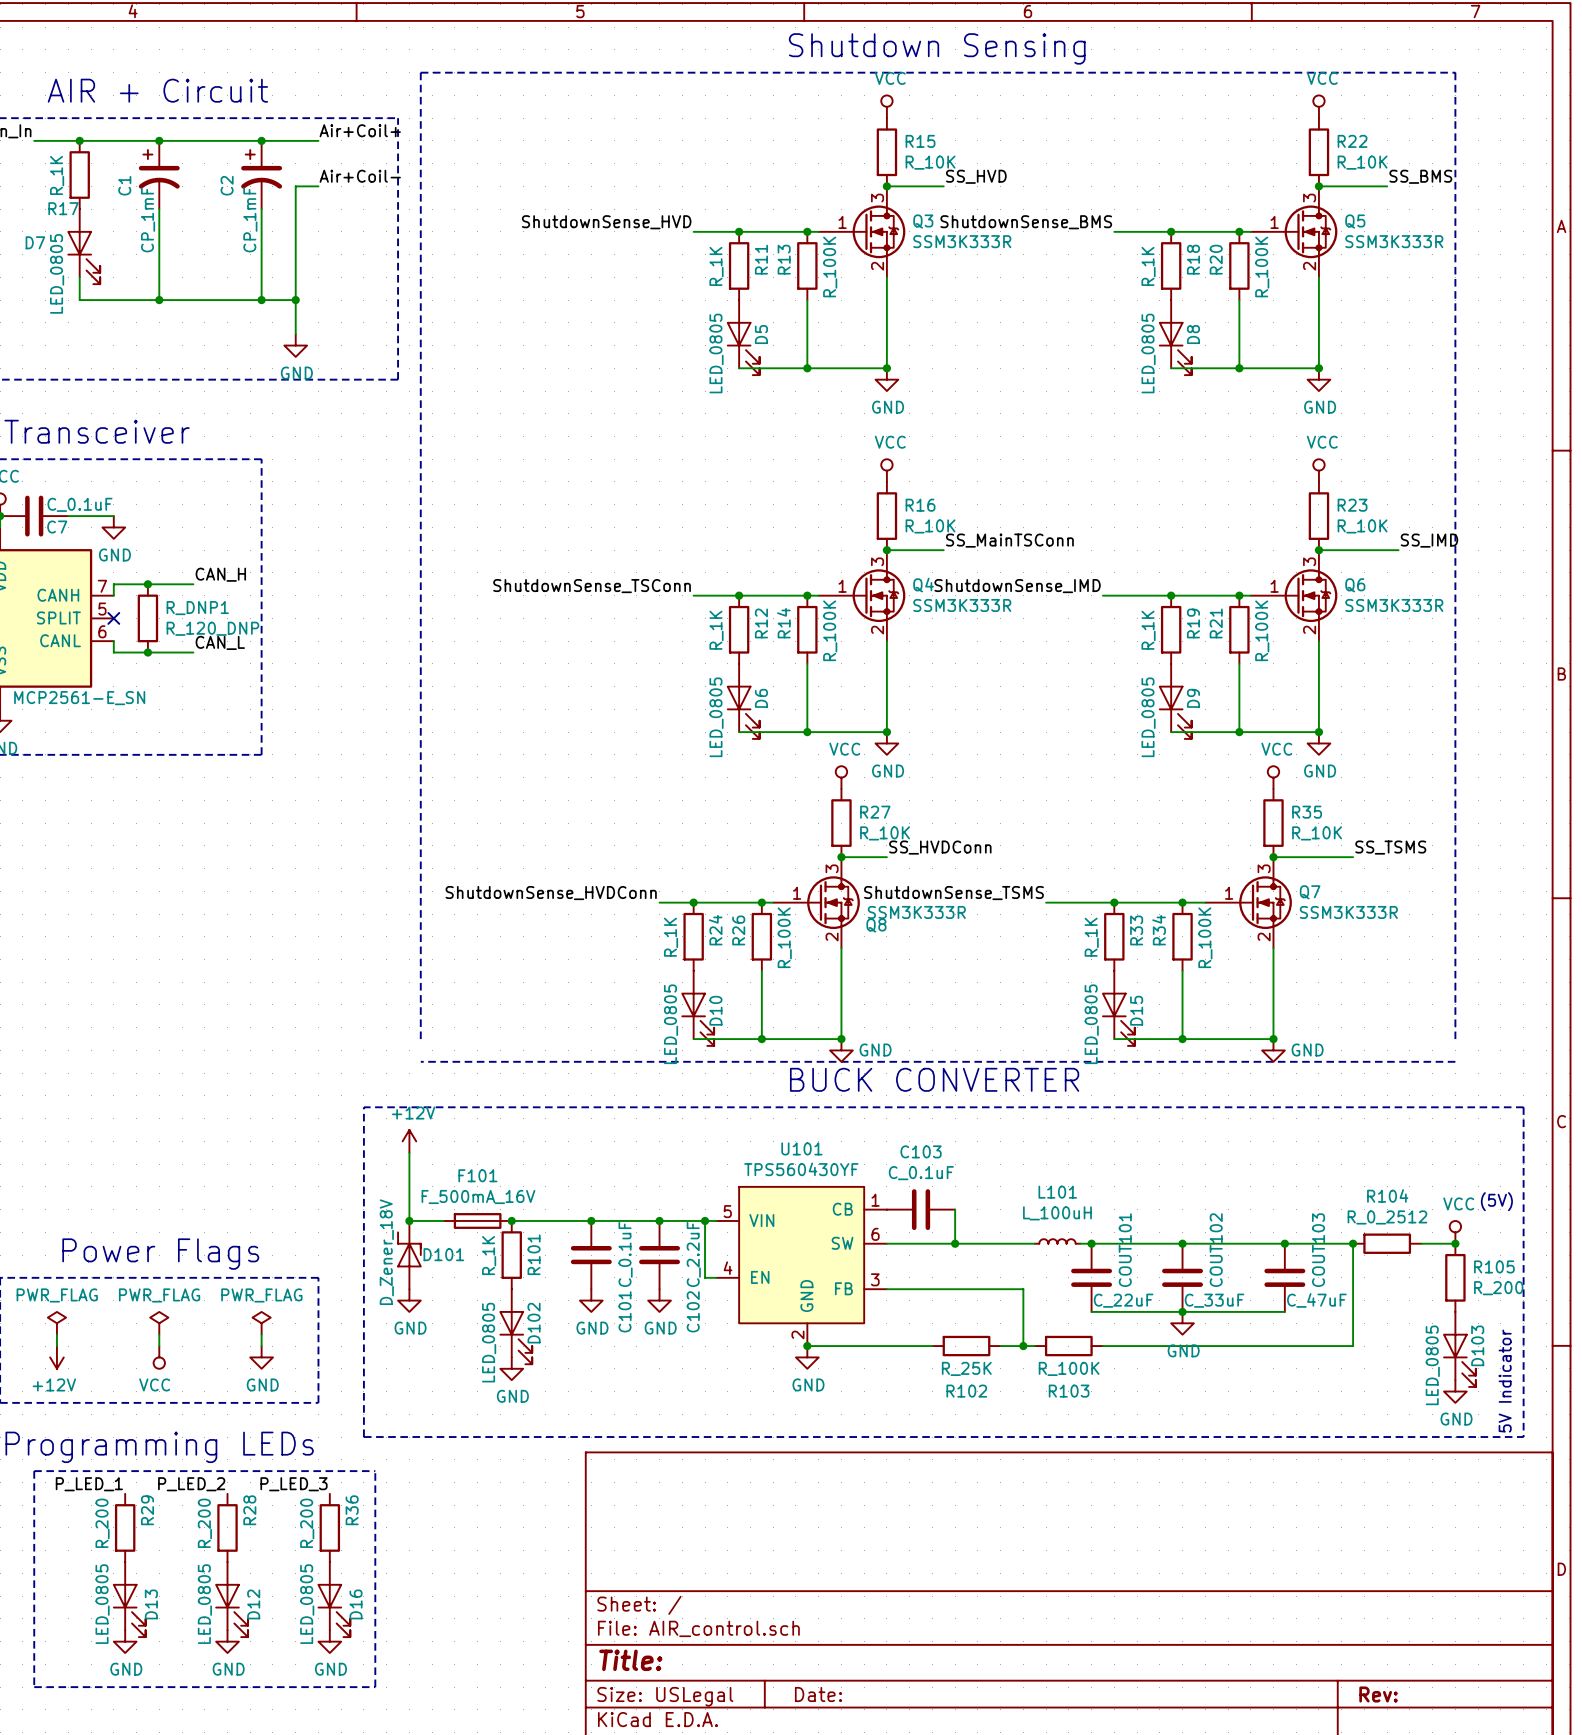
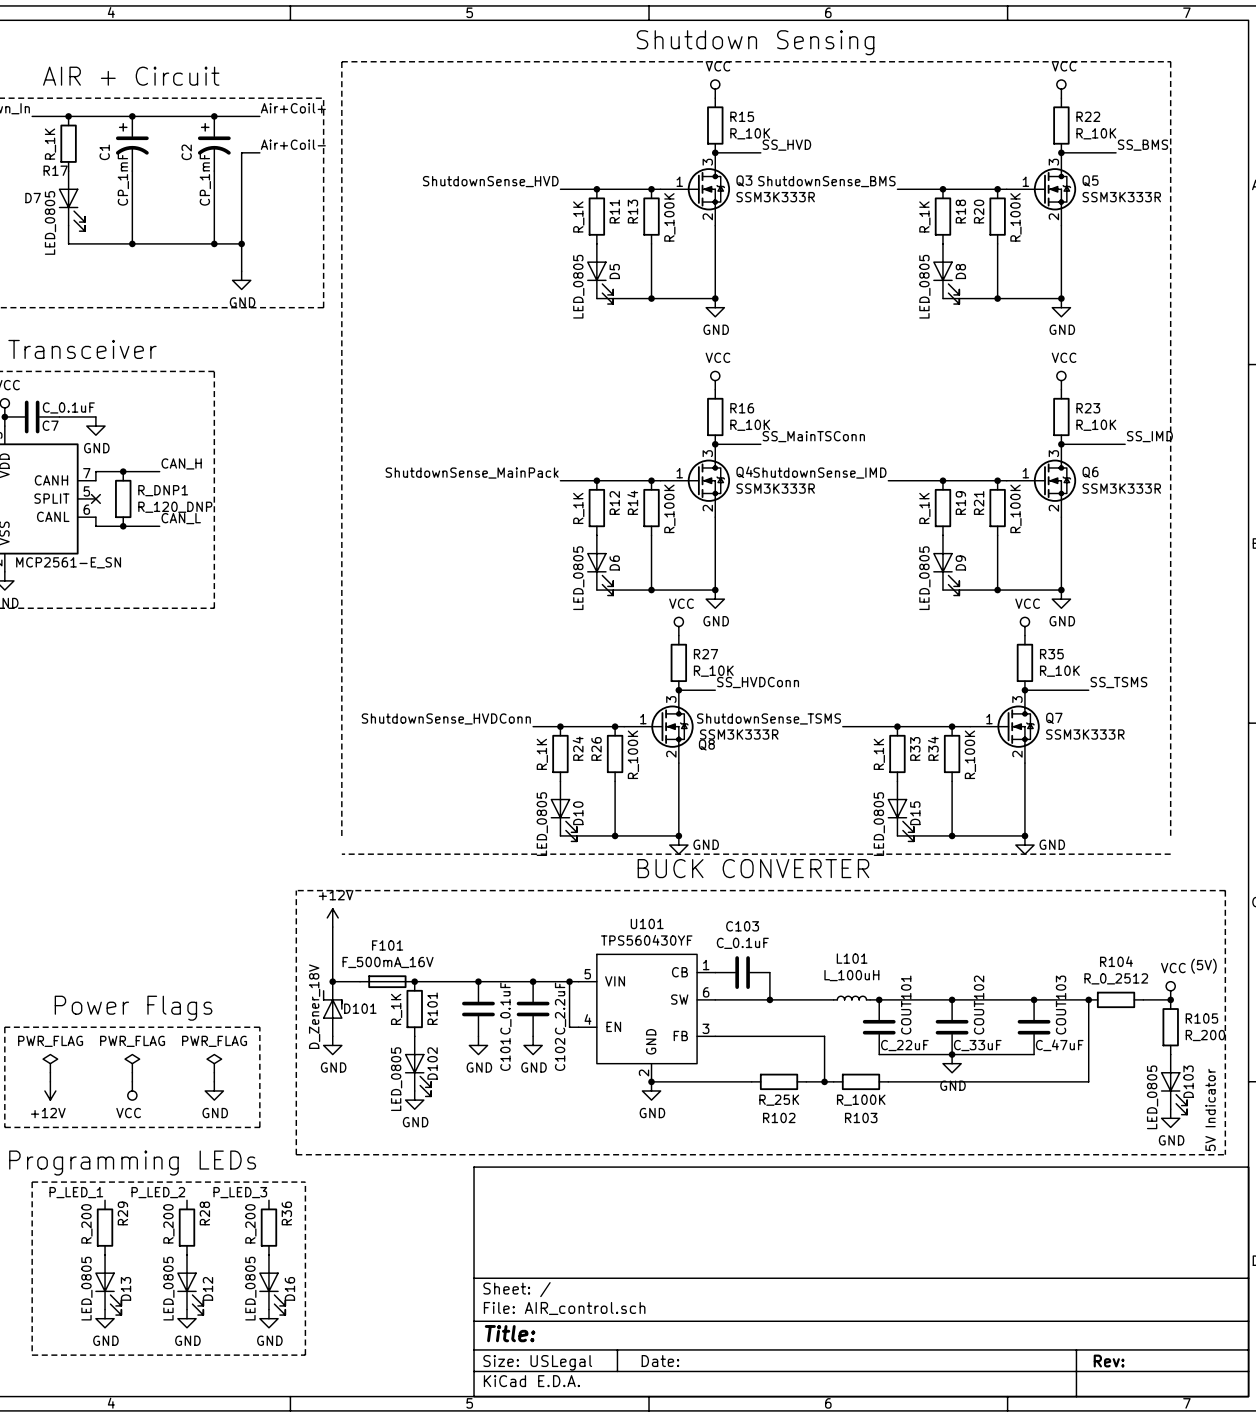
label: ShutdownSense_TSConn (592, 586) -> ShutdownSense_MainPack (472, 473)

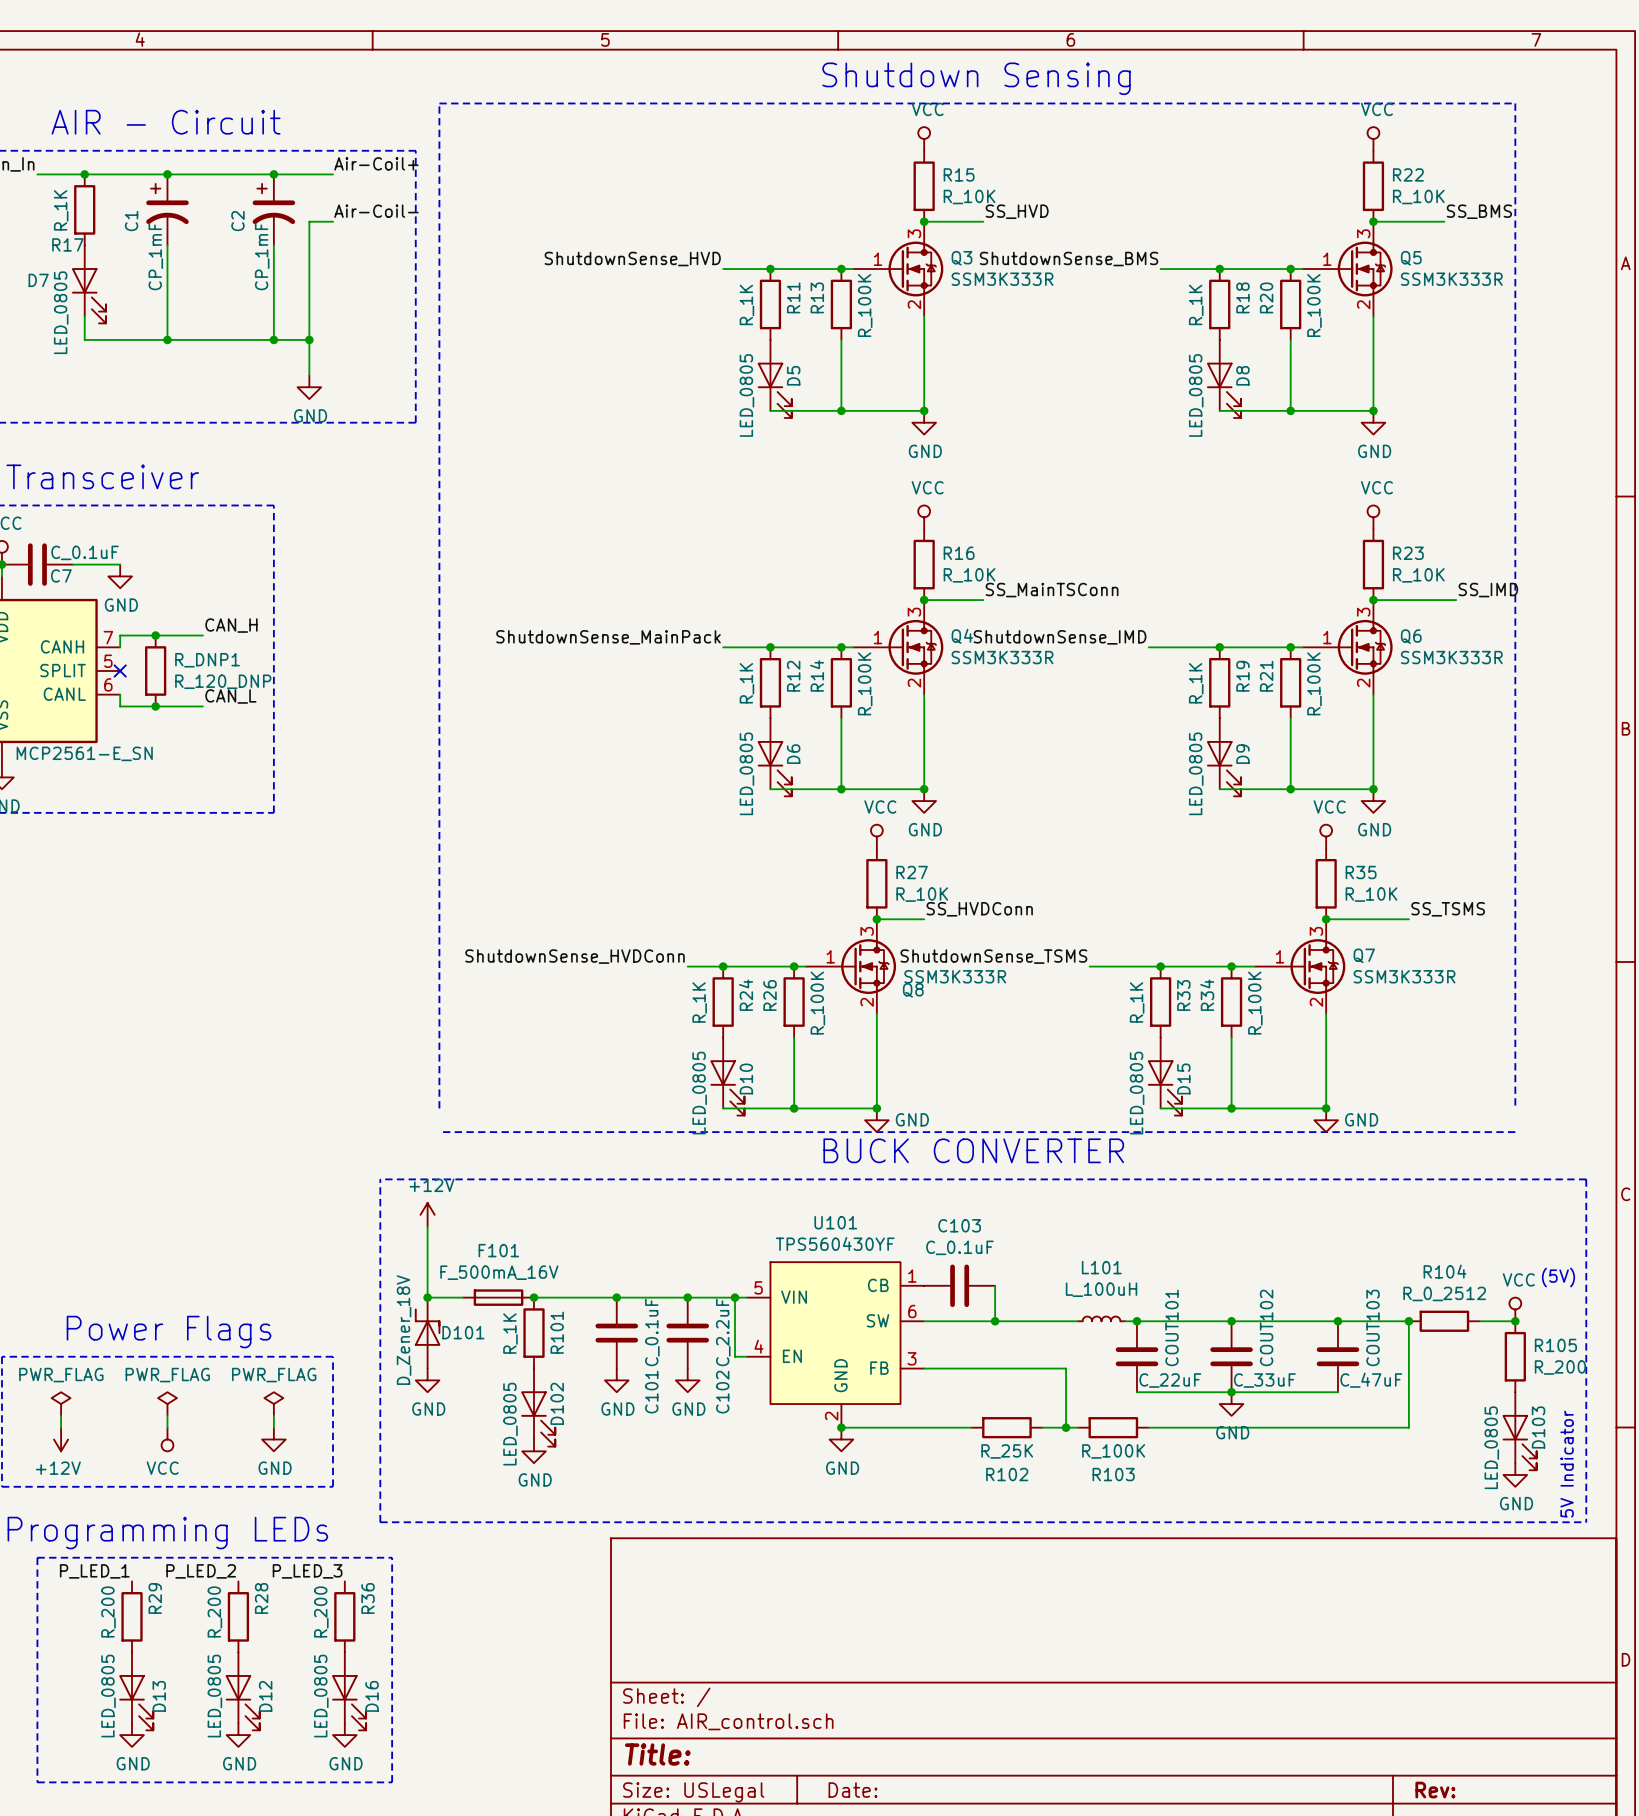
text: AIR + Circuit (131, 76) -> AIR - Circuit (166, 122)
label: Air+Coil+ (293, 108) -> Air-Coil+ (376, 163)
label: Air+Coil- (293, 144) -> Air-Coil- (376, 211)

